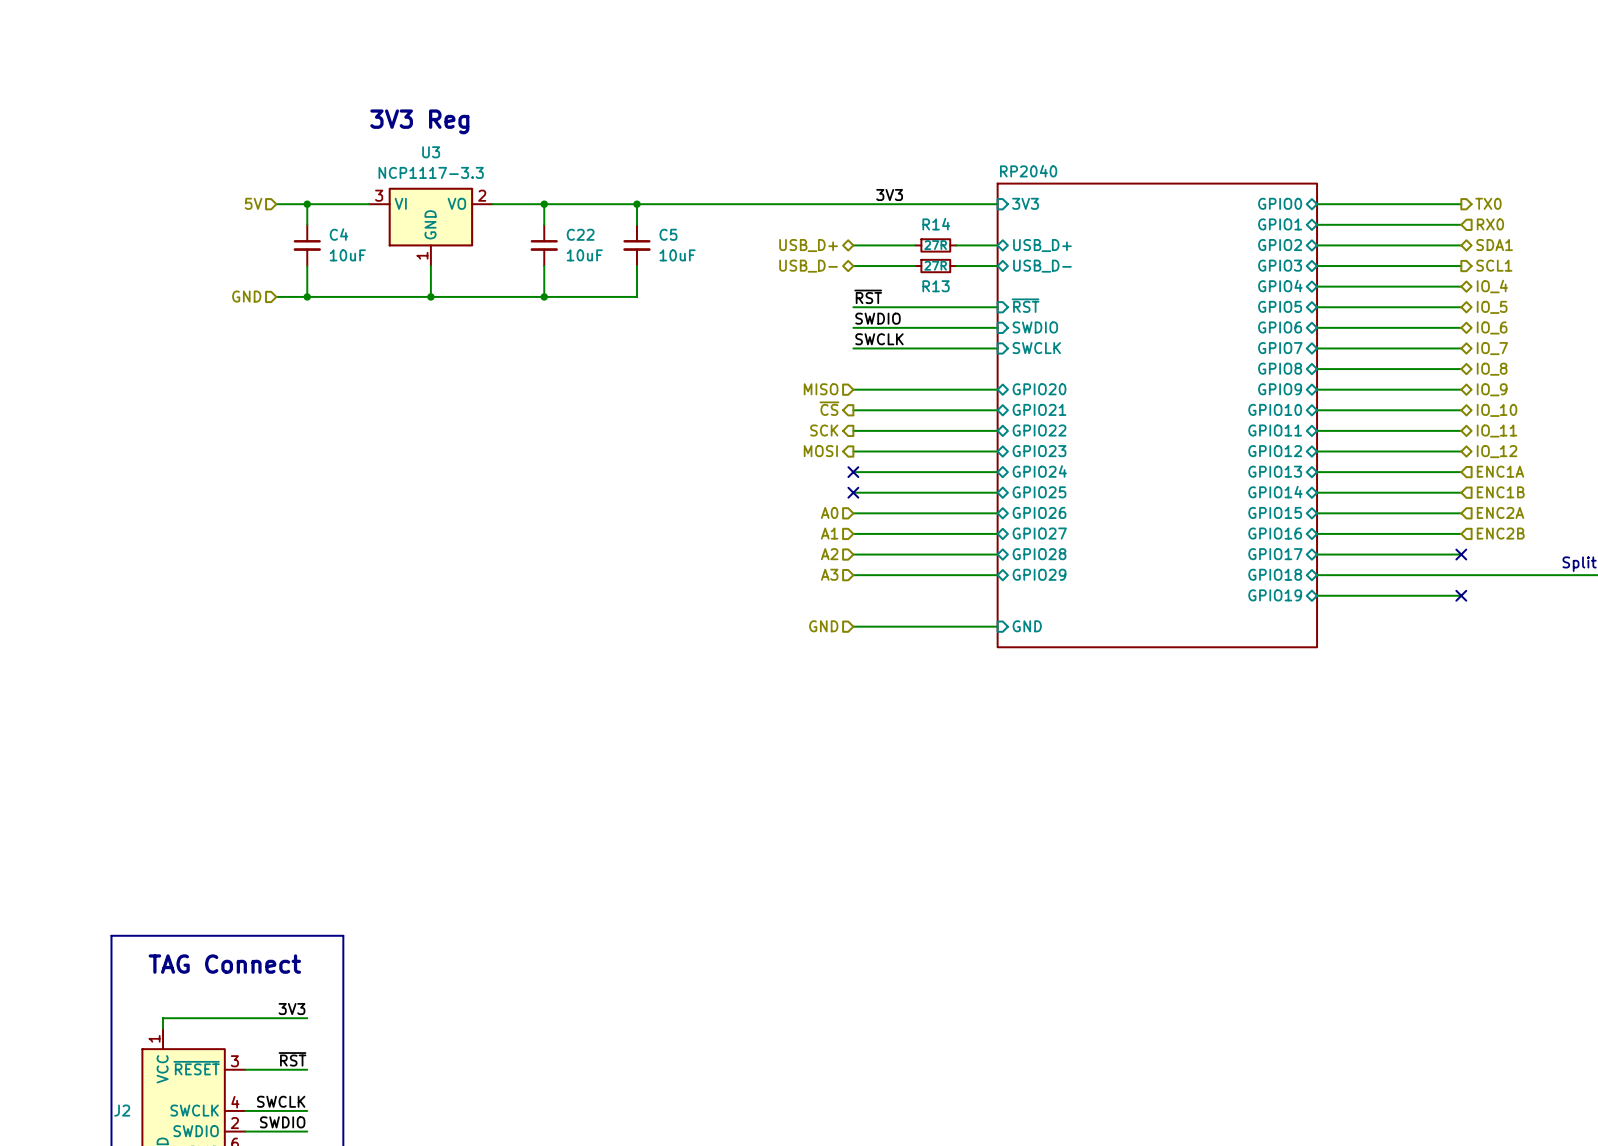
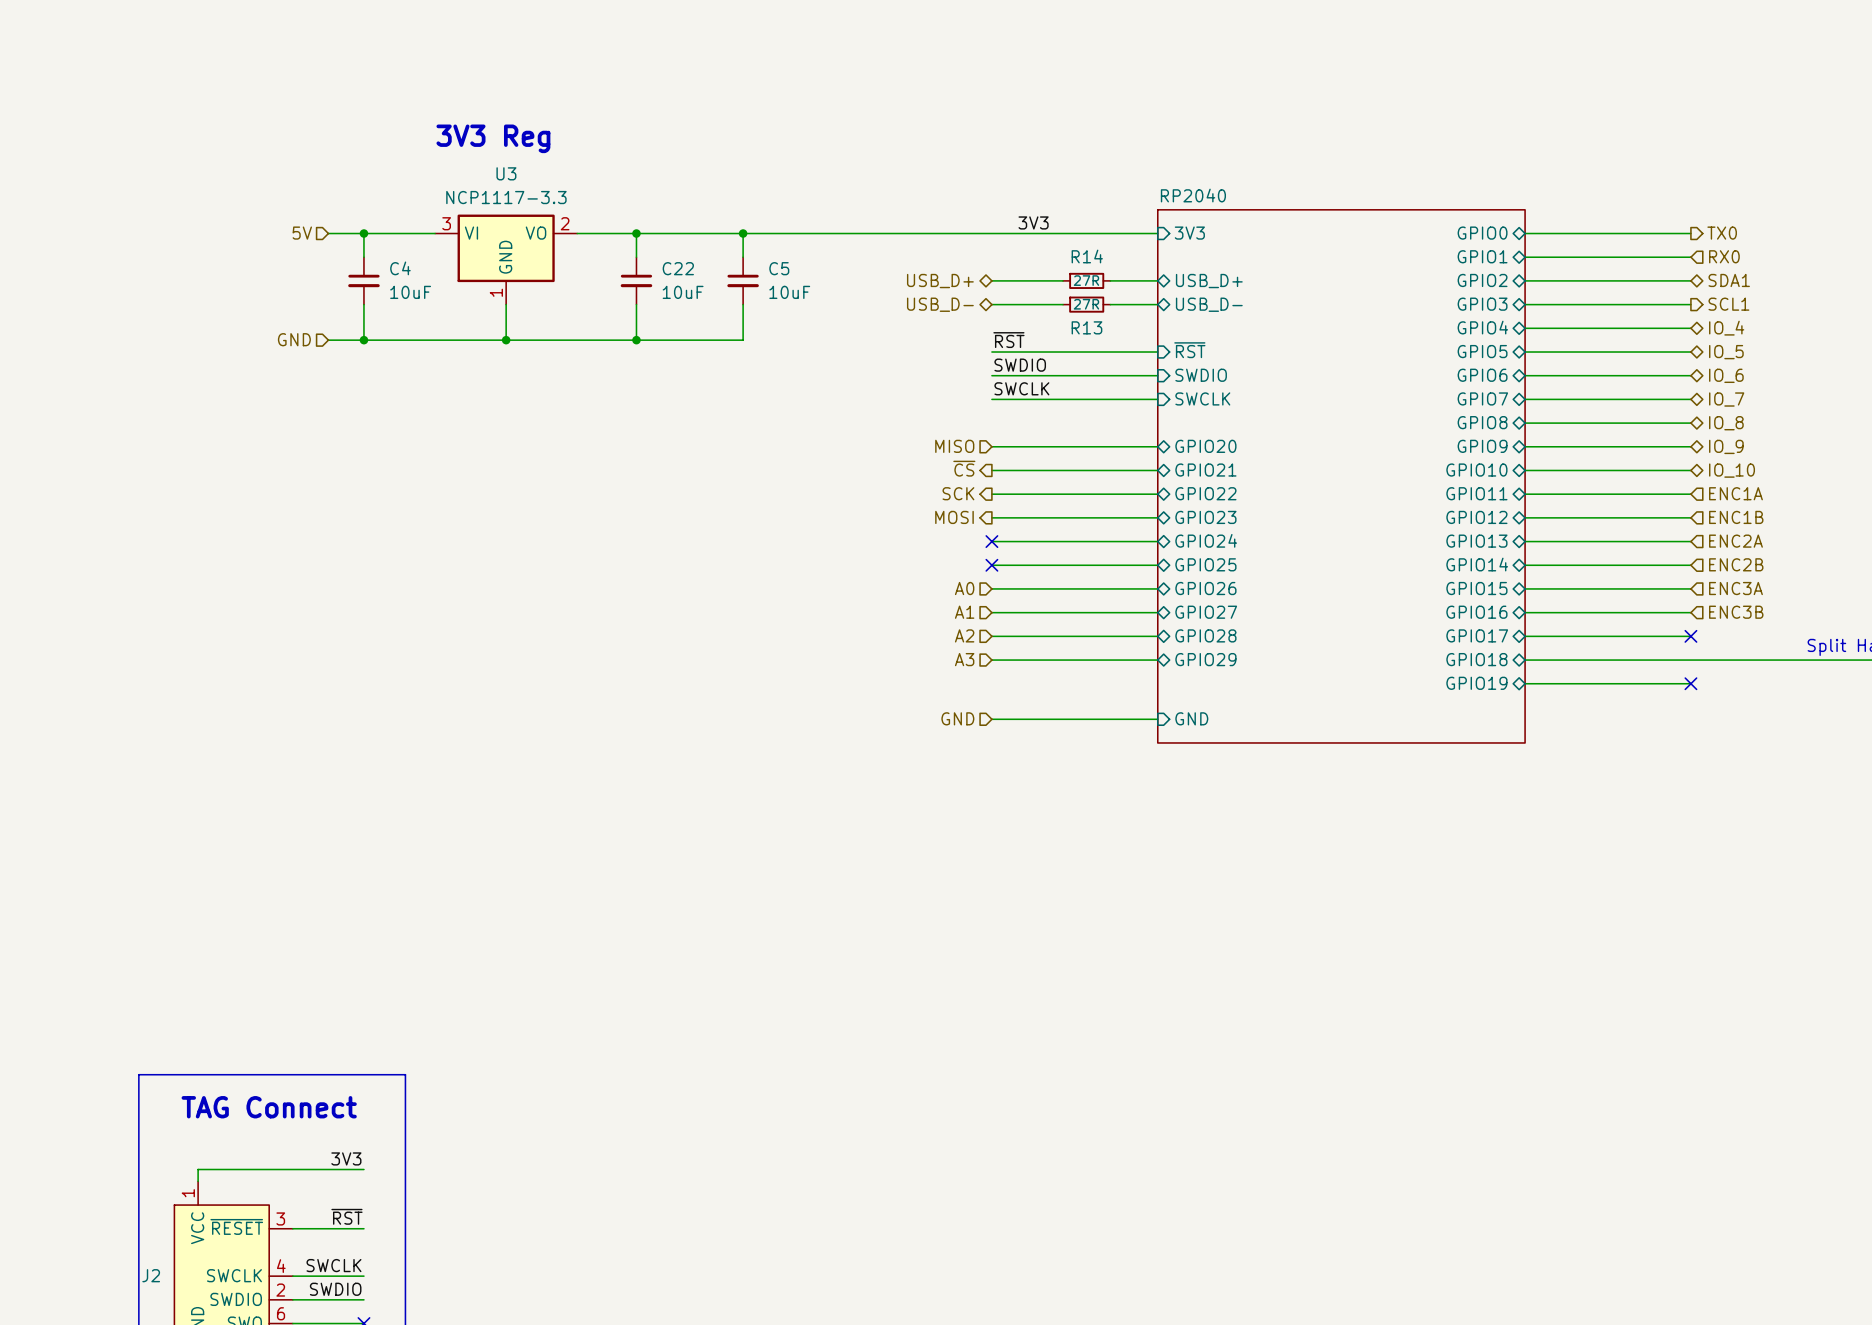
hierarchical label shape: bidirectional (1497, 431) -> input (1735, 493)
hierarchical label: IO_11 (1497, 431) -> ENC1A (1735, 493)
hierarchical label shape: bidirectional (1497, 451) -> input (1736, 517)
hierarchical label: IO_12 (1497, 451) -> ENC1B (1736, 517)
hierarchical label: ENC1A (1500, 471) -> ENC2A (1735, 541)
hierarchical label: ENC1B (1500, 492) -> ENC2B (1736, 564)
hierarchical label: ENC2A (1500, 512) -> ENC3A (1735, 588)
hierarchical label: ENC2B (1500, 533) -> ENC3B (1736, 612)

